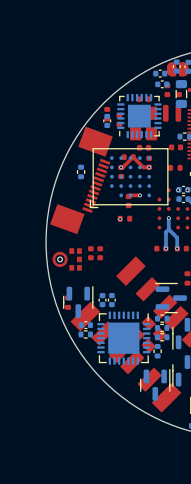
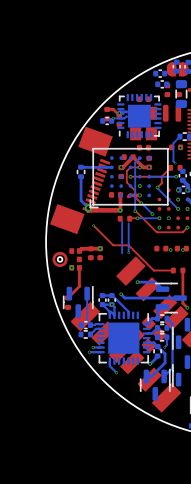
top track: none -> (107, 109) (113, 109) (119, 115)
bottom track: none -> (129, 111) (119, 112)
via: none -> (119, 113)
bottom track: none -> (129, 116) (113, 118)
via: none -> (113, 118)
part rotation: 0° (107, 120) -> 90° clockwise (107, 120)
bottom track: none -> (180, 136) (173, 143) (173, 161) (175, 163)
via: none -> (180, 147)
bottom track: none -> (139, 158) (135, 162) (135, 211)
via: none -> (175, 163)
bottom track: none -> (81, 167) (111, 167)
top track: none -> (139, 167) (130, 167) (126, 171) (126, 182) (135, 190) (135, 197) (141, 203)
via: none -> (139, 167)
top track: none -> (170, 167) (161, 176) (130, 176)
bottom track: none -> (81, 176) (81, 200) (88, 207)
via: none -> (130, 176)
top track: none -> (161, 176) (161, 183) (157, 187)
bottom track: none -> (176, 176) (149, 176)
via: none -> (176, 176)
bottom track: none -> (182, 180) (188, 185) (187, 190)
via: none -> (139, 186)
bottom track: none -> (157, 187) (178, 208)
via: none -> (157, 187)
top track: none -> (120, 195) (120, 210) (87, 209)
via: none -> (178, 199)
part rotation: 0° (183, 199) -> 90° clockwise (182, 175)
part position: (183, 199) -> (182, 175)
part rotation: 0° (128, 200) -> 90° clockwise (116, 194)
part position: (128, 200) -> (116, 194)
bottom track: none -> (141, 203) (152, 214)
via: none -> (141, 203)
via: none -> (88, 207)
via: none -> (178, 208)
via: none -> (187, 208)
via: none -> (120, 210)
top track: none -> (135, 211) (156, 232) (182, 232) (187, 227)
via: none -> (135, 211)
via: none -> (152, 214)
top track: none -> (137, 218) (129, 218)
via: none -> (137, 218)
bottom track: none -> (159, 218) (137, 218)
via: none -> (159, 218)
bottom track: (168, 218) (168, 229) -> none
via: (120, 219) -> none
bottom track: none -> (122, 221) (122, 253)
bottom track: none -> (128, 223) (128, 252)
top track: none -> (93, 225) (113, 245) (128, 245) (153, 270) (173, 270)
via: none -> (93, 225)
via: none -> (159, 227)
via: none -> (187, 227)
bottom track: (168, 229) (177, 237) (177, 248) -> none
bottom track: (168, 229) (166, 232) (166, 248) -> none
top track: none -> (100, 248) (81, 248) (79, 251)
via: none -> (100, 248)
via: (166, 248) -> none
via: (177, 248) -> none
via: none -> (170, 249)
via: none -> (182, 249)
via: none -> (128, 252)
via: none -> (71, 267)
top track: none -> (79, 267) (79, 286) (68, 297)
top track: none -> (182, 270) (182, 303) (187, 307)
part rotation: 0° (187, 278) -> 90° clockwise (178, 270)
part position: (187, 278) -> (178, 270)
bottom track: none -> (137, 282) (155, 282) (162, 289)
via: none -> (137, 282)
bottom track: none -> (87, 293) (87, 321) (90, 325) (100, 324)
bottom track: none -> (121, 294) (124, 298) (180, 298)
via: none -> (121, 294)
bottom track: none -> (102, 295) (112, 295) (128, 311) (128, 315)
via: none -> (111, 304)
bottom track: none -> (162, 306) (157, 311) (157, 318) (152, 318) (146, 324)
via: none -> (187, 307)
bottom track: none -> (109, 311) (114, 315) (114, 307) (111, 304) (102, 304) (109, 311)
bottom track: none -> (167, 318) (172, 324) (172, 368) (164, 376)
bottom track: none -> (157, 327) (151, 333) (146, 333)
bottom track: none -> (100, 328) (96, 328) (90, 334)
bottom track: none -> (166, 337) (166, 345) (164, 347)
bottom track: none -> (146, 342) (153, 342) (165, 353) (165, 362) (151, 376) (146, 376)
via: none -> (93, 347)
bottom track: none -> (100, 347) (93, 347)
via: none -> (164, 347)
via: none -> (89, 352)
bottom track: none -> (100, 352) (89, 352)
bottom track: none -> (157, 356) (150, 363)
bottom track: none -> (109, 361) (109, 366) (116, 372)
via: none -> (150, 363)
via: none -> (116, 372)

